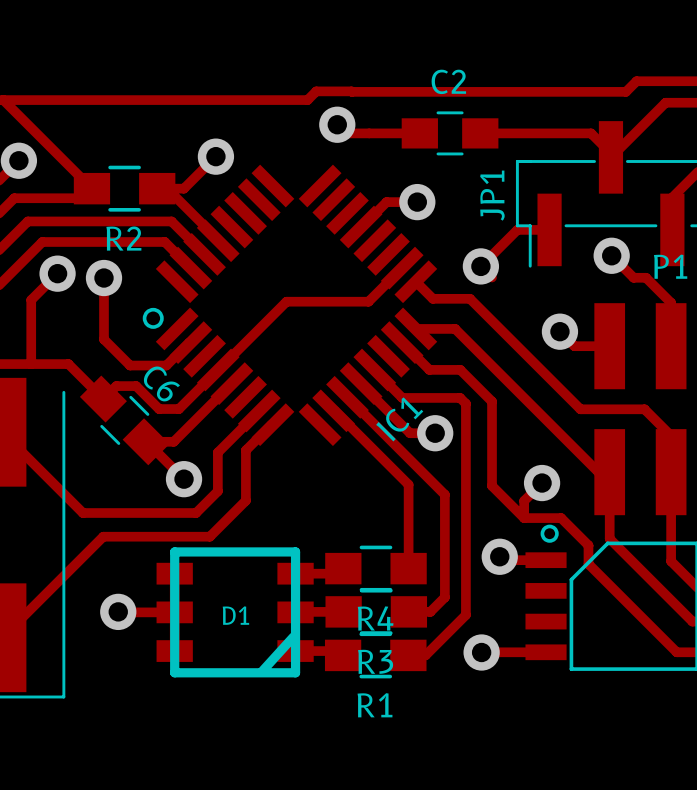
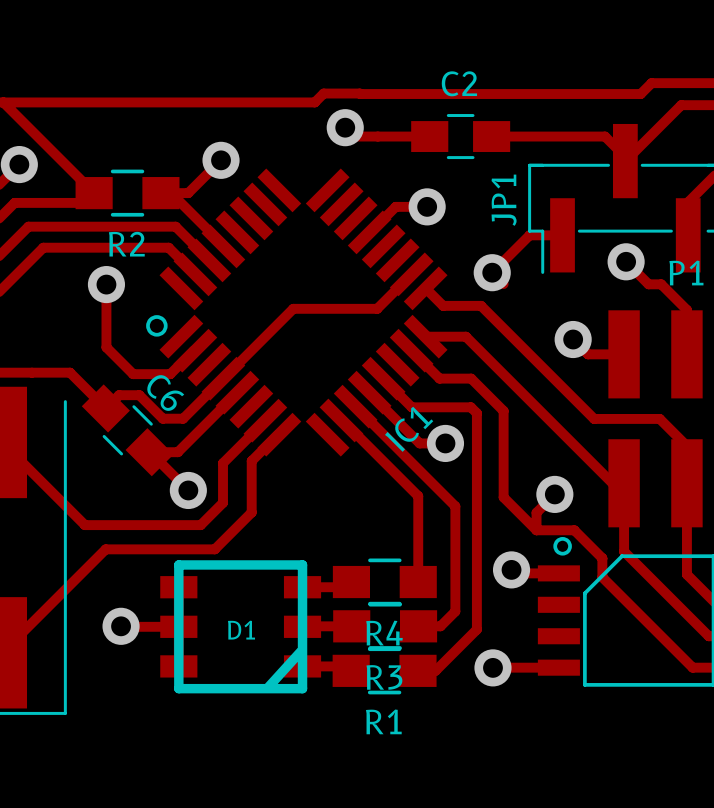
track: (57, 273) (31, 300) (31, 364) -> none
via: (57, 273) -> none

